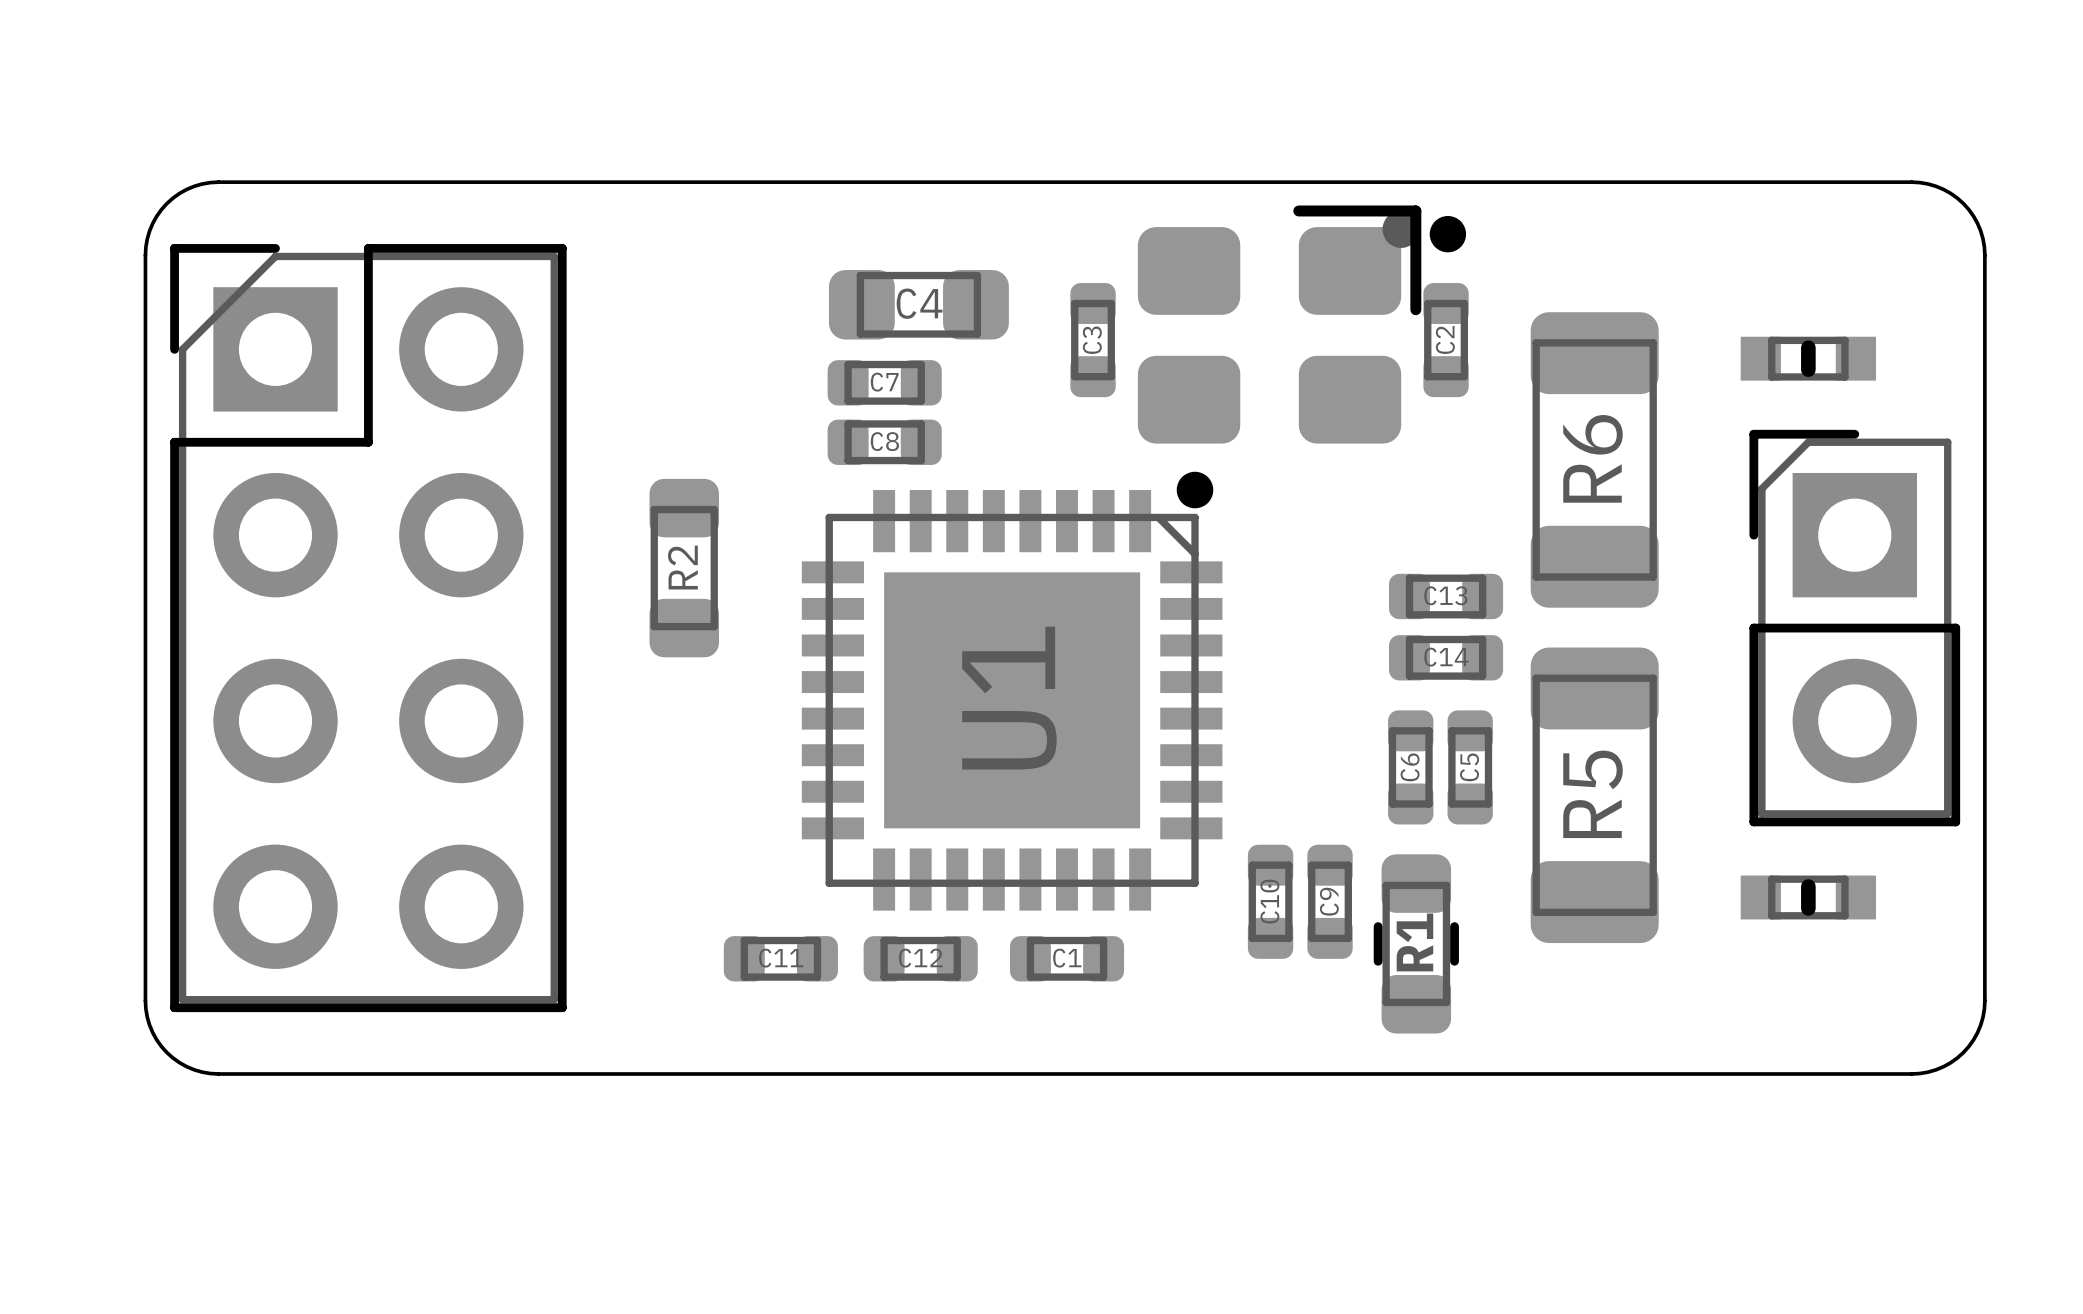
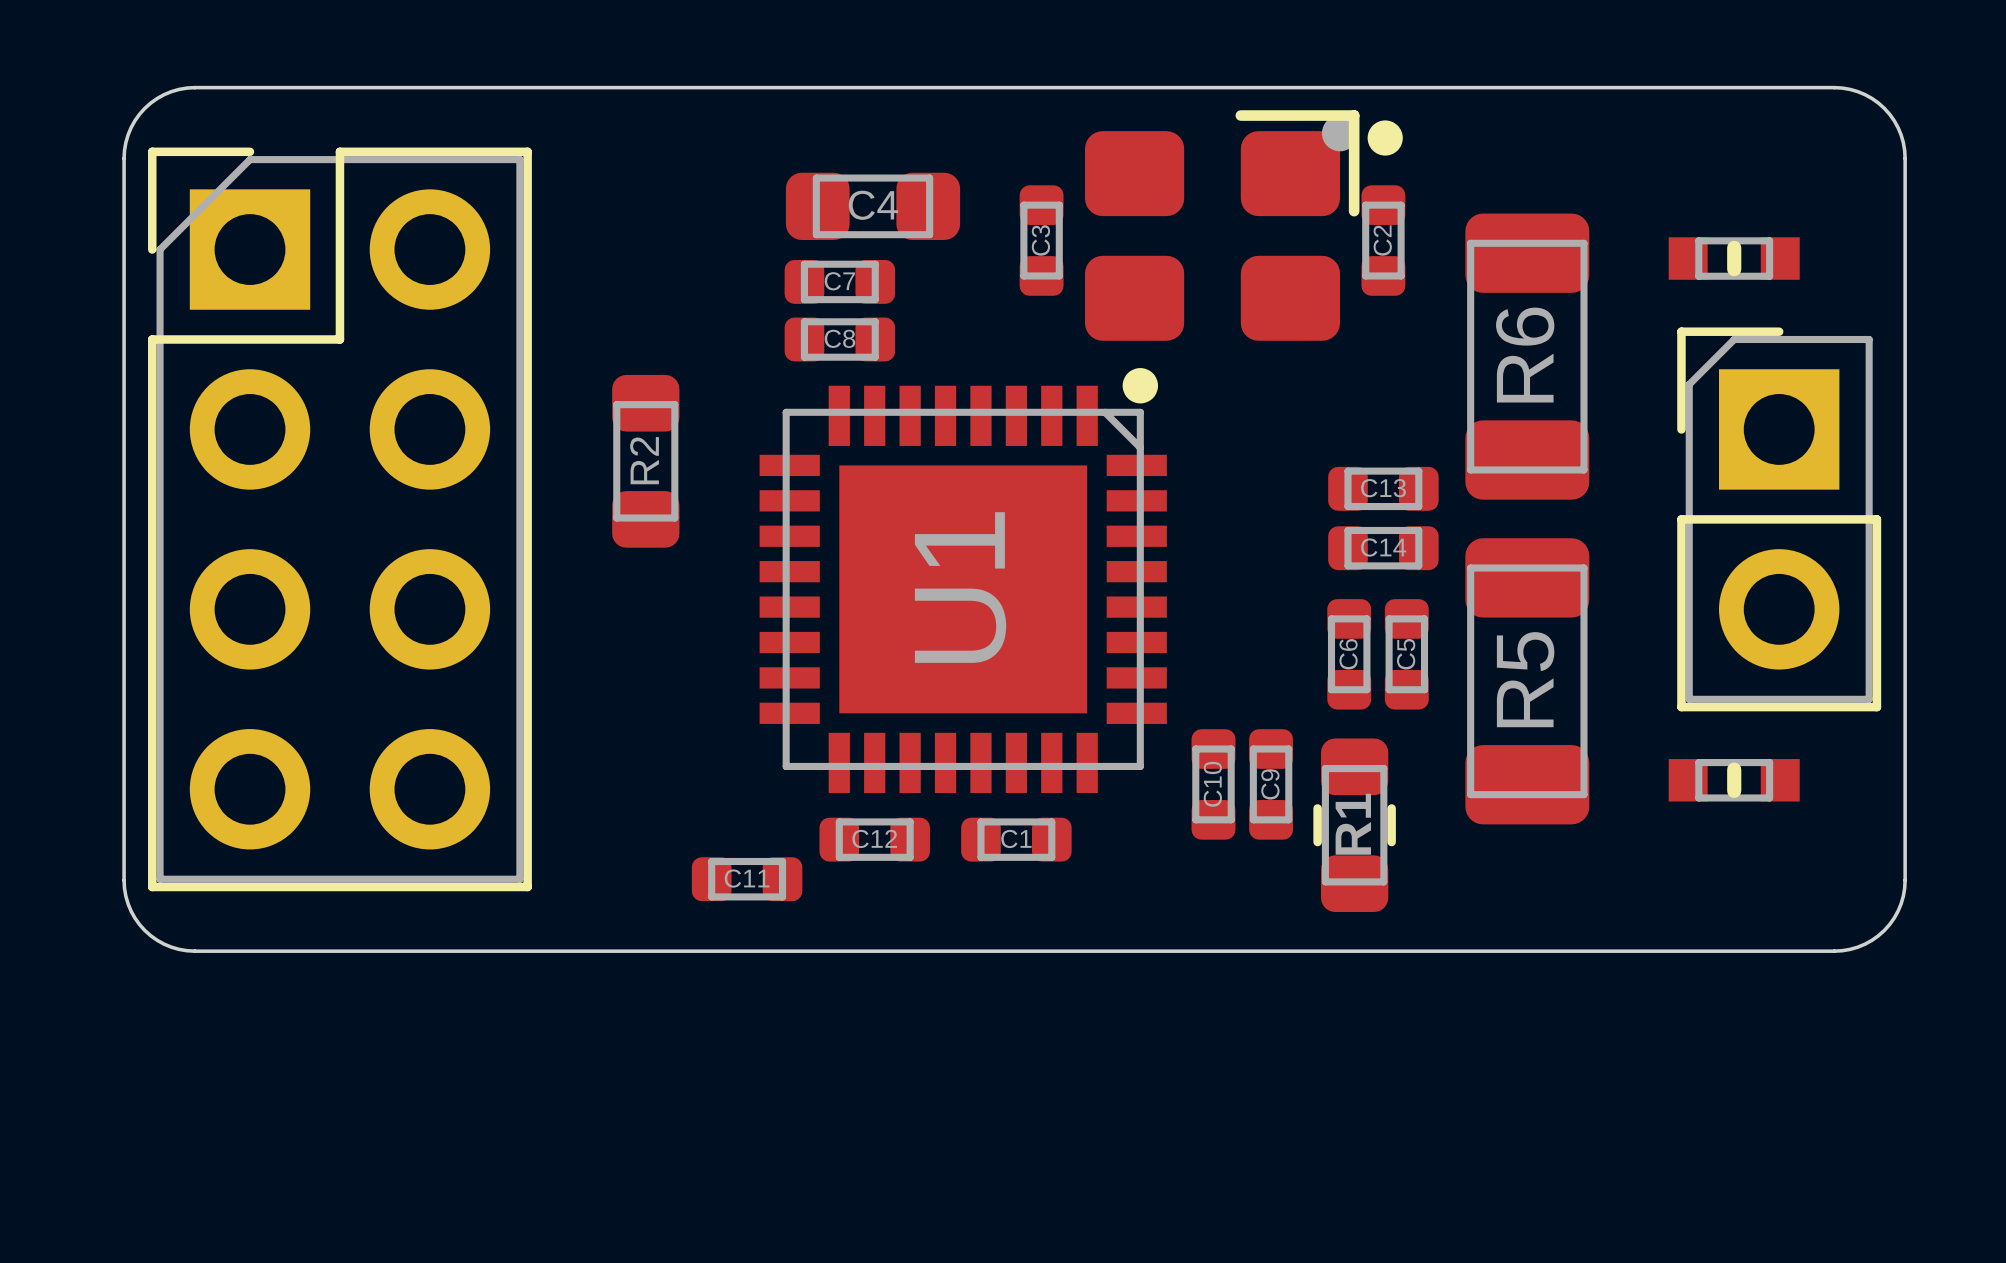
C11 position: (780, 958) -> (747, 879)

